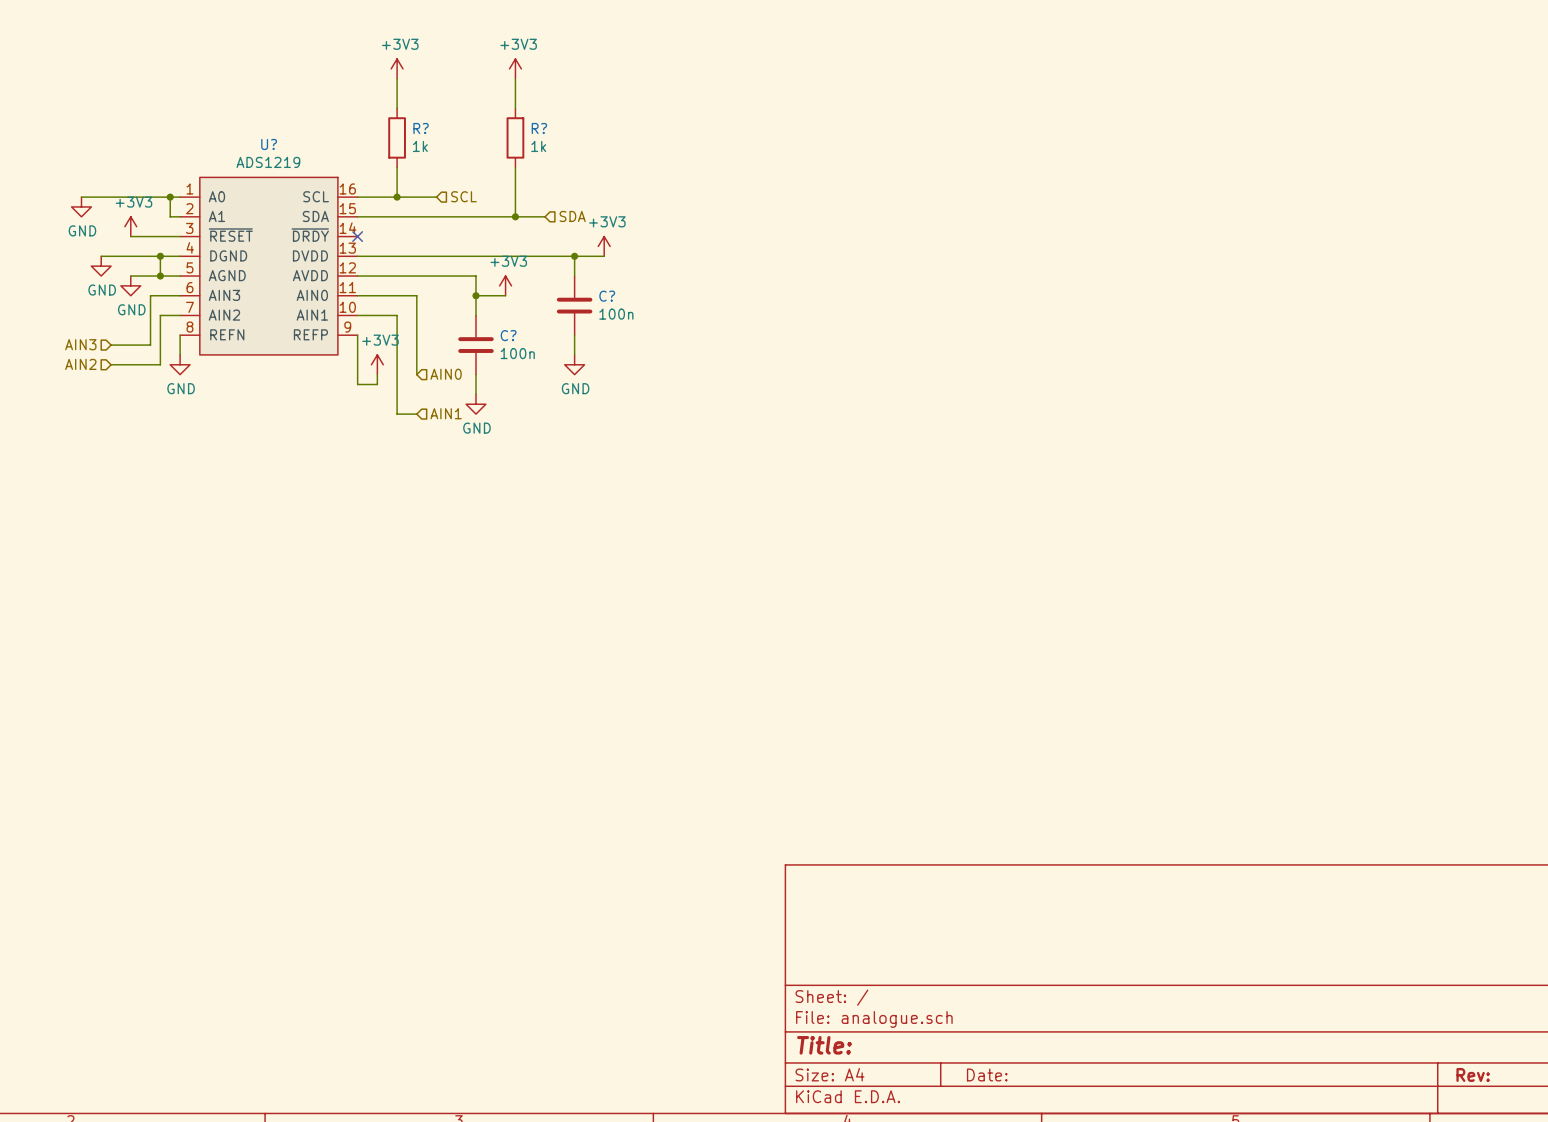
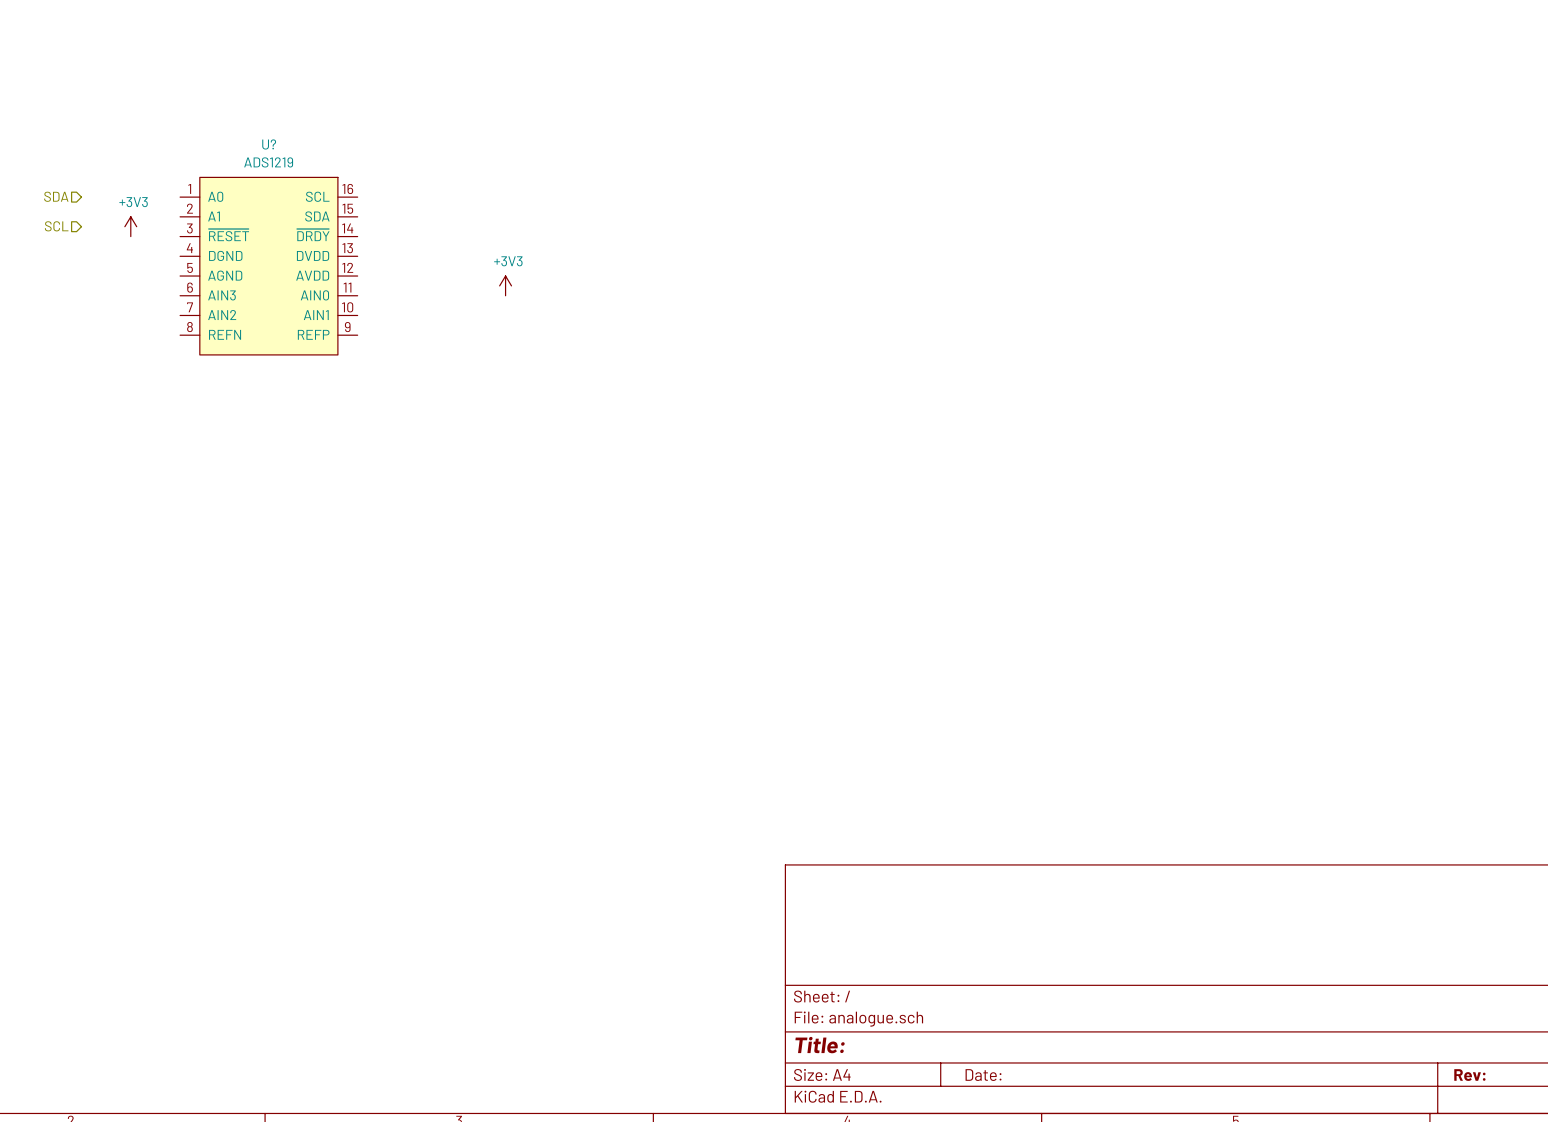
power symbol: +3V3 (397, 68) -> none
power symbol: +3V3 (515, 68) -> none
wire: (397, 78) (397, 108) -> none
wire: (515, 78) (515, 108) -> none
R?: 1k (397, 137) -> none
R?: 1k (515, 137) -> none
wire: (397, 167) (397, 197) -> none
wire: (515, 167) (515, 216) -> none
hierarchical label: none -> SDA (56, 196)
hierarchical label: SCL (463, 196) -> none
wire: (81, 197) (180, 197) -> none
wire: (170, 197) (170, 216) (180, 216) -> none
junction: (170, 197) -> none
wire: (357, 197) (436, 197) -> none
junction: (397, 197) -> none
power symbol: GND (81, 206) -> none
wire: (357, 216) (545, 216) -> none
junction: (515, 216) -> none
hierarchical label: SDA (572, 216) -> none
hierarchical label: none -> SCL (56, 226)
wire: (130, 236) (180, 236) -> none
no-connect mark: (357, 236) -> none
power symbol: +3V3 (604, 246) -> none
wire: (101, 256) (180, 256) -> none
wire: (160, 256) (160, 276) -> none
junction: (160, 256) -> none
wire: (357, 256) (604, 256) -> none
wire: (574, 256) (574, 276) -> none
junction: (574, 256) -> none
power symbol: GND (101, 266) -> none
wire: (130, 276) (180, 276) -> none
junction: (160, 276) -> none
wire: (357, 276) (475, 276) (475, 315) -> none
power symbol: GND (130, 285) -> none
wire: (180, 295) (150, 295) (150, 345) (111, 345) -> none
wire: (357, 295) (416, 295) (416, 374) -> none
wire: (475, 295) (505, 295) -> none
junction: (475, 295) -> none
C?: 100n (574, 305) -> none
wire: (180, 315) (160, 315) (160, 364) (111, 364) -> none
wire: (357, 315) (397, 315) (397, 414) (416, 414) -> none
wire: (180, 335) (180, 354) -> none
wire: (357, 335) (357, 384) (377, 384) (377, 374) -> none
wire: (574, 335) (574, 354) -> none
hierarchical label: AIN3 (80, 344) -> none
C?: 100n (475, 345) -> none
hierarchical label: AIN2 (80, 364) -> none
power symbol: GND (180, 364) -> none
power symbol: +3V3 (377, 364) -> none
power symbol: GND (574, 364) -> none
hierarchical label: AIN0 (446, 374) -> none
wire: (475, 374) (475, 394) -> none
power symbol: GND (475, 404) -> none
hierarchical label: AIN1 (446, 413) -> none

